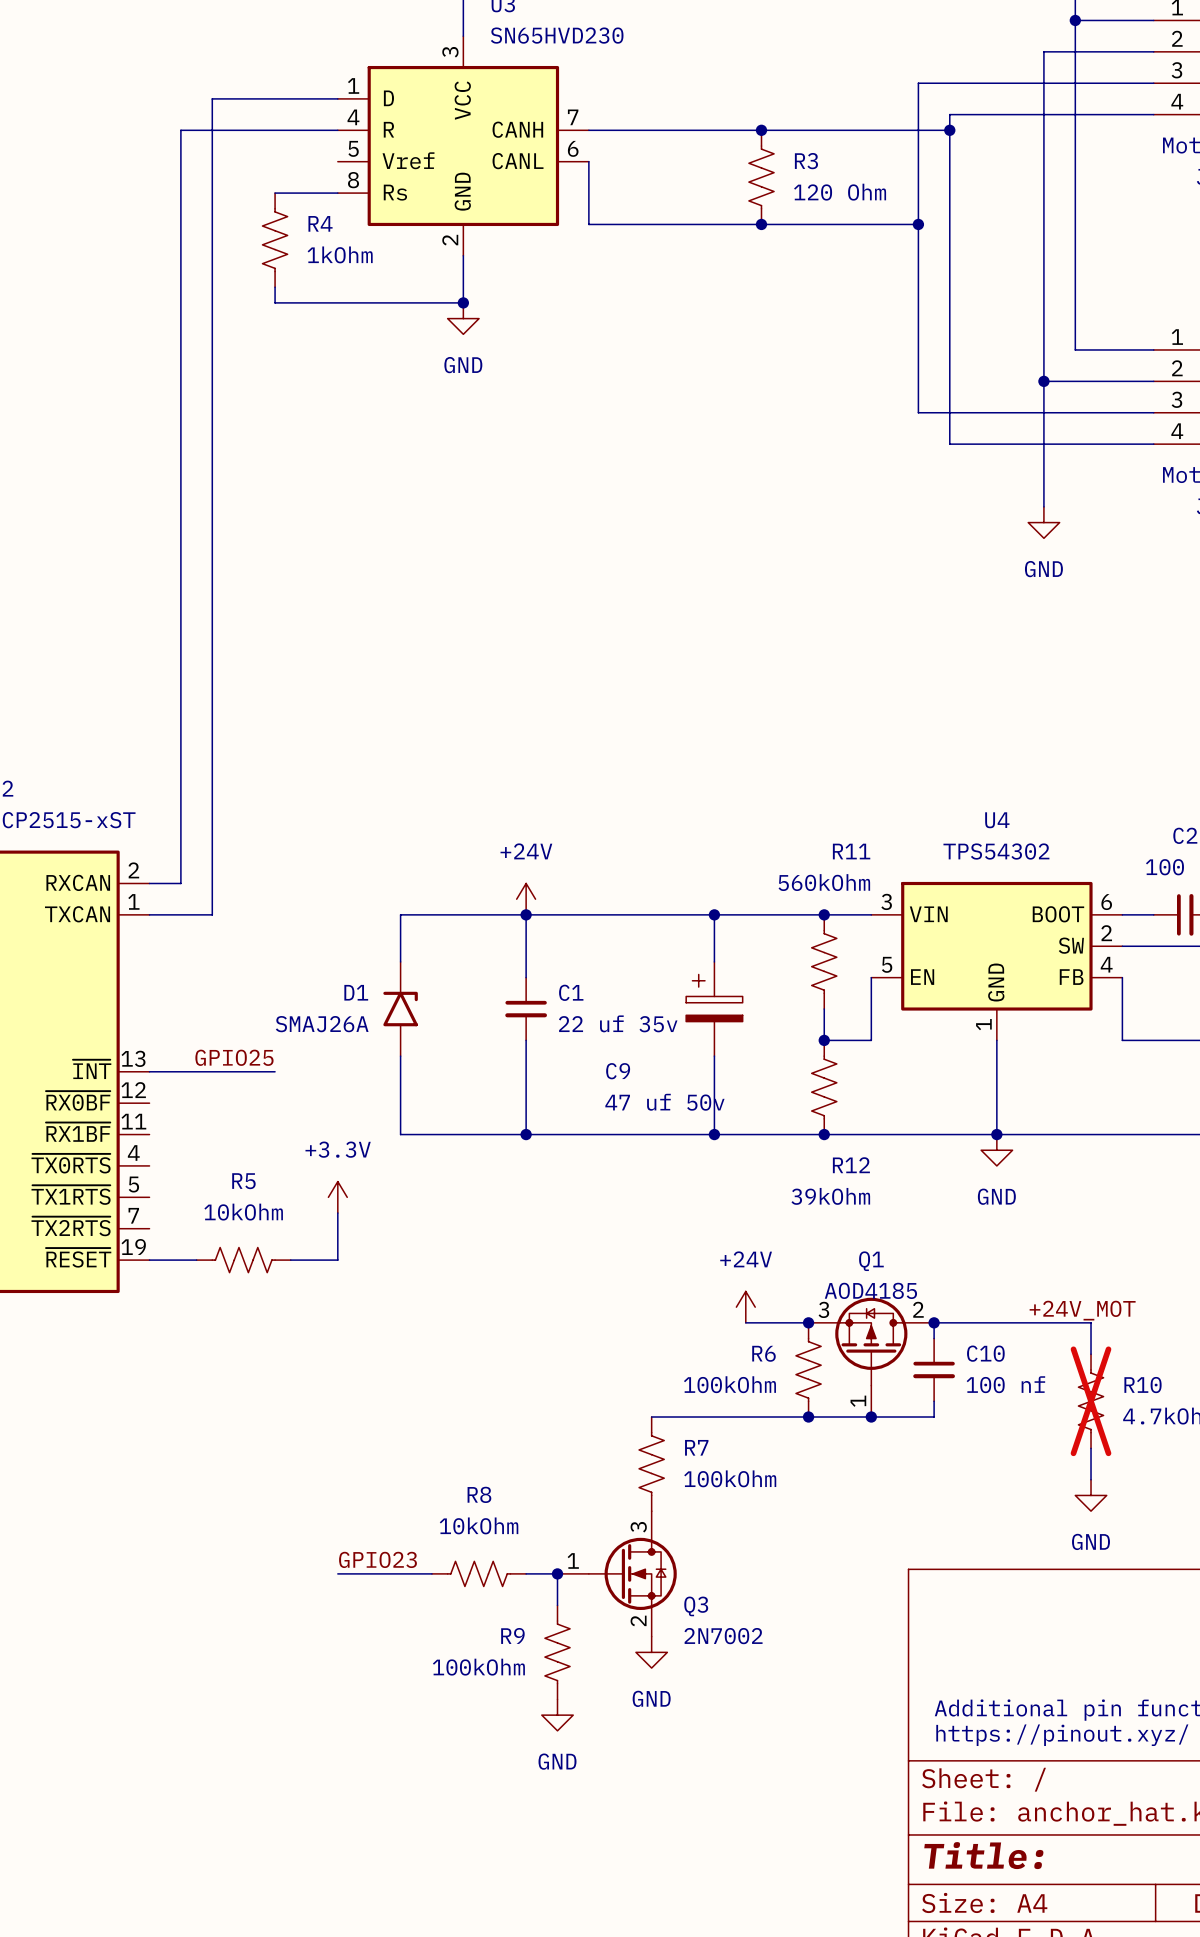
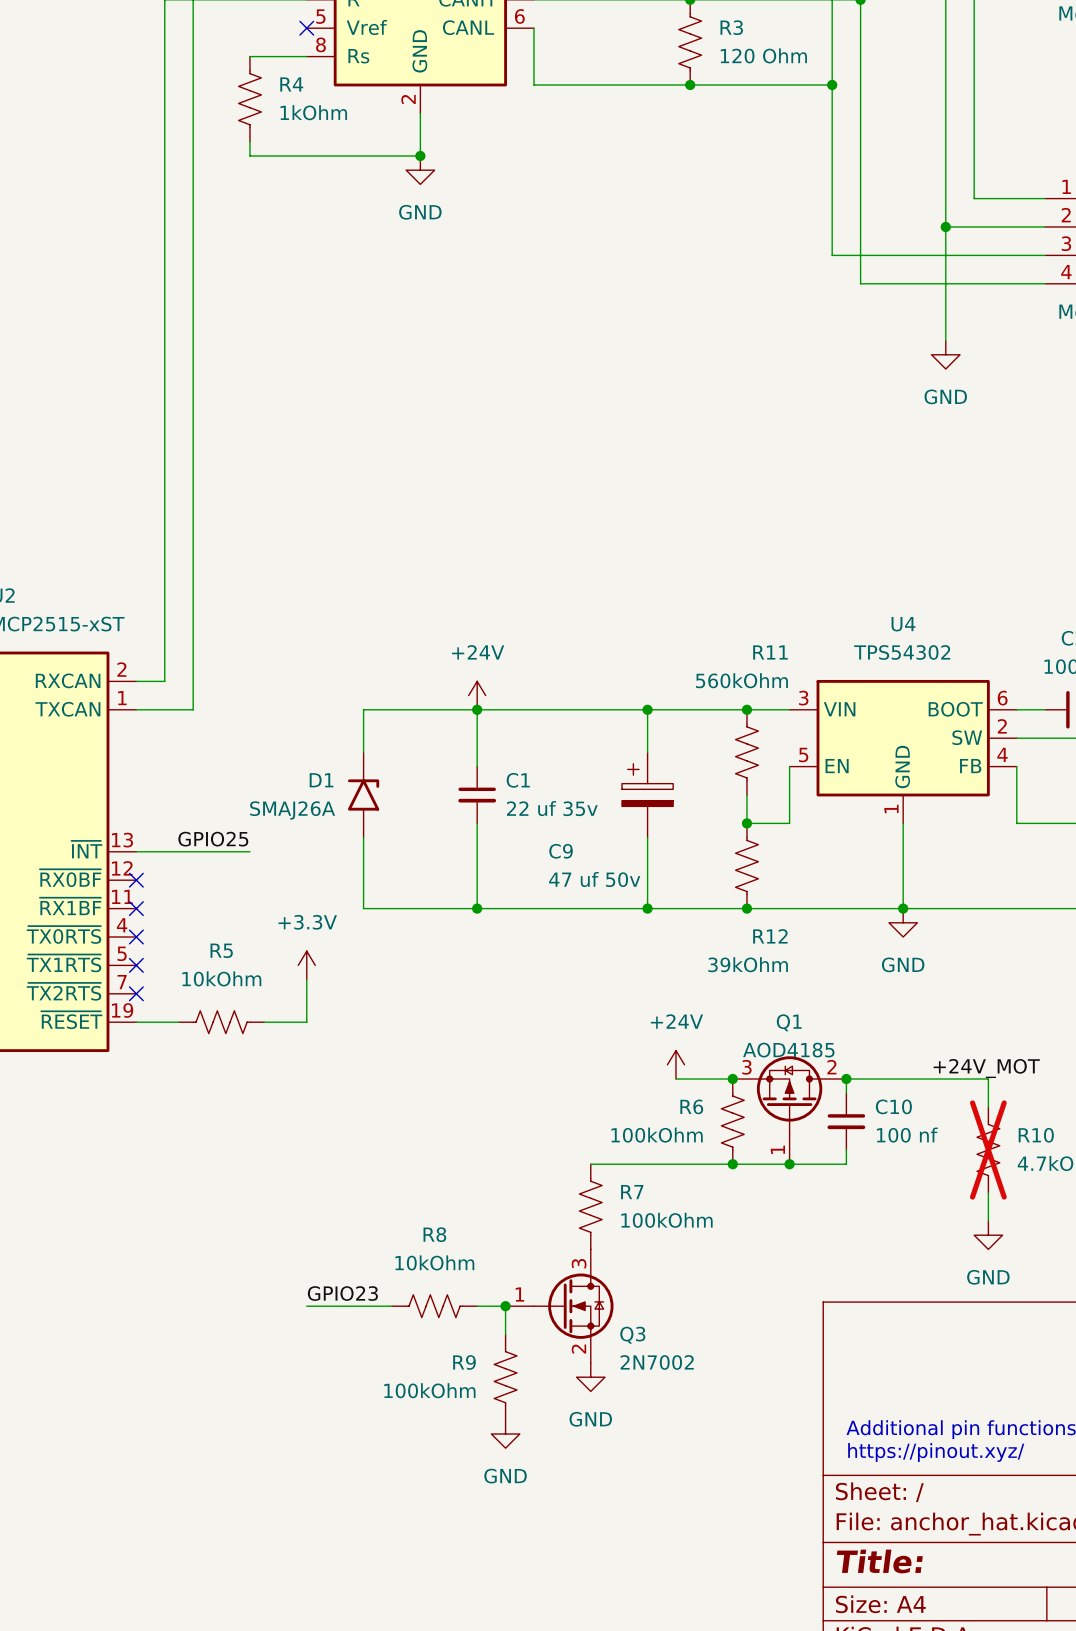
no-connect mark: none -> (306, 28)
no-connect mark: none -> (136, 880)
no-connect mark: none -> (136, 908)
no-connect mark: none -> (136, 937)
no-connect mark: none -> (136, 965)
no-connect mark: none -> (136, 993)

